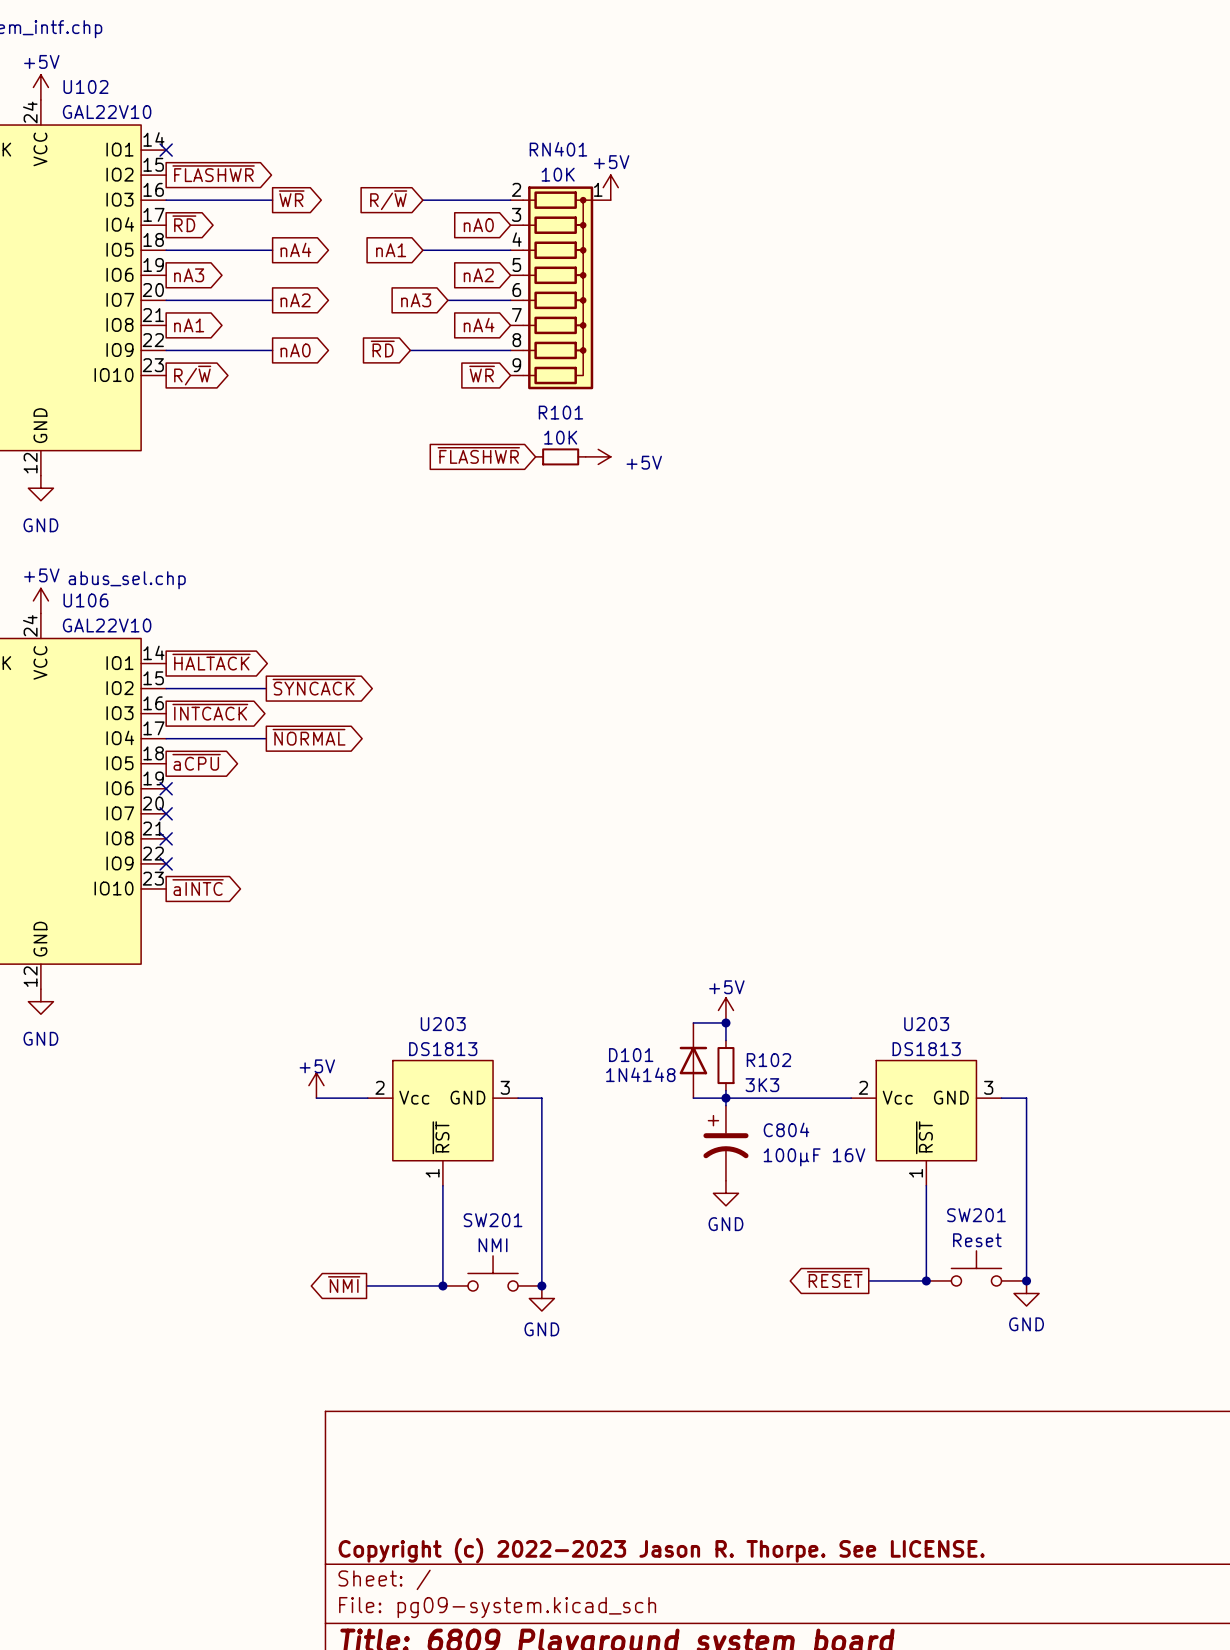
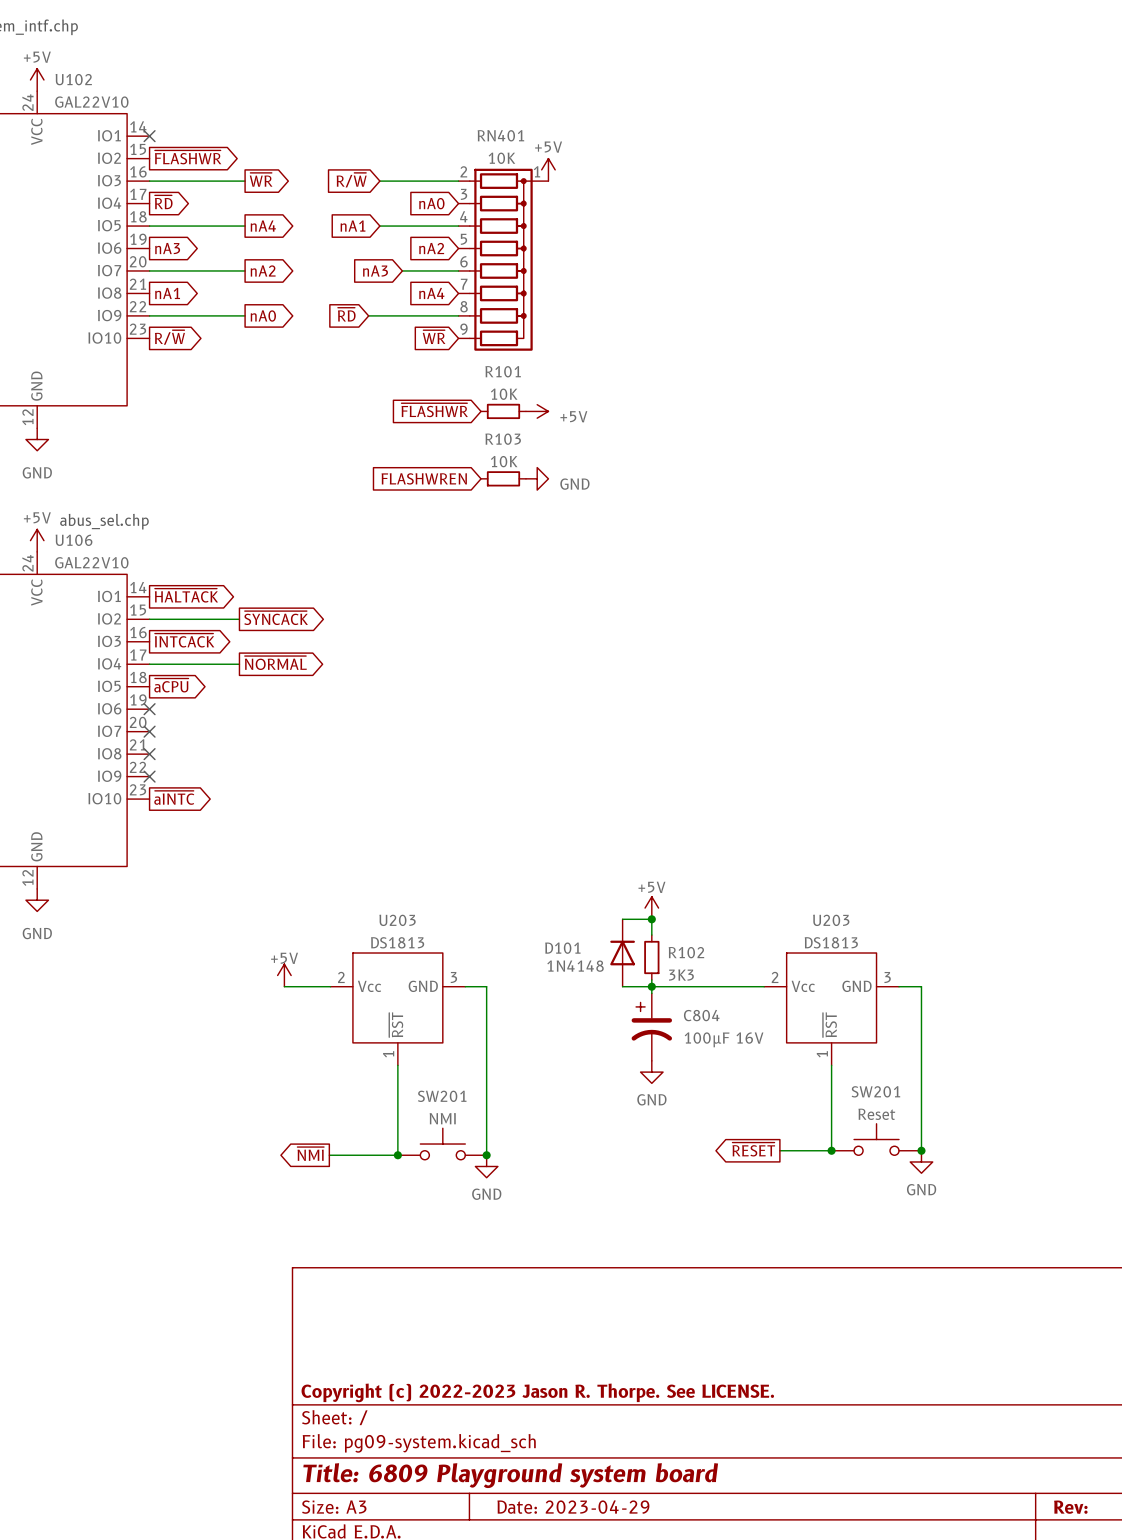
global label: none -> FLASHWREN (424, 478)
R103: none -> 10K (503, 478)
power symbol: none -> GND (537, 478)

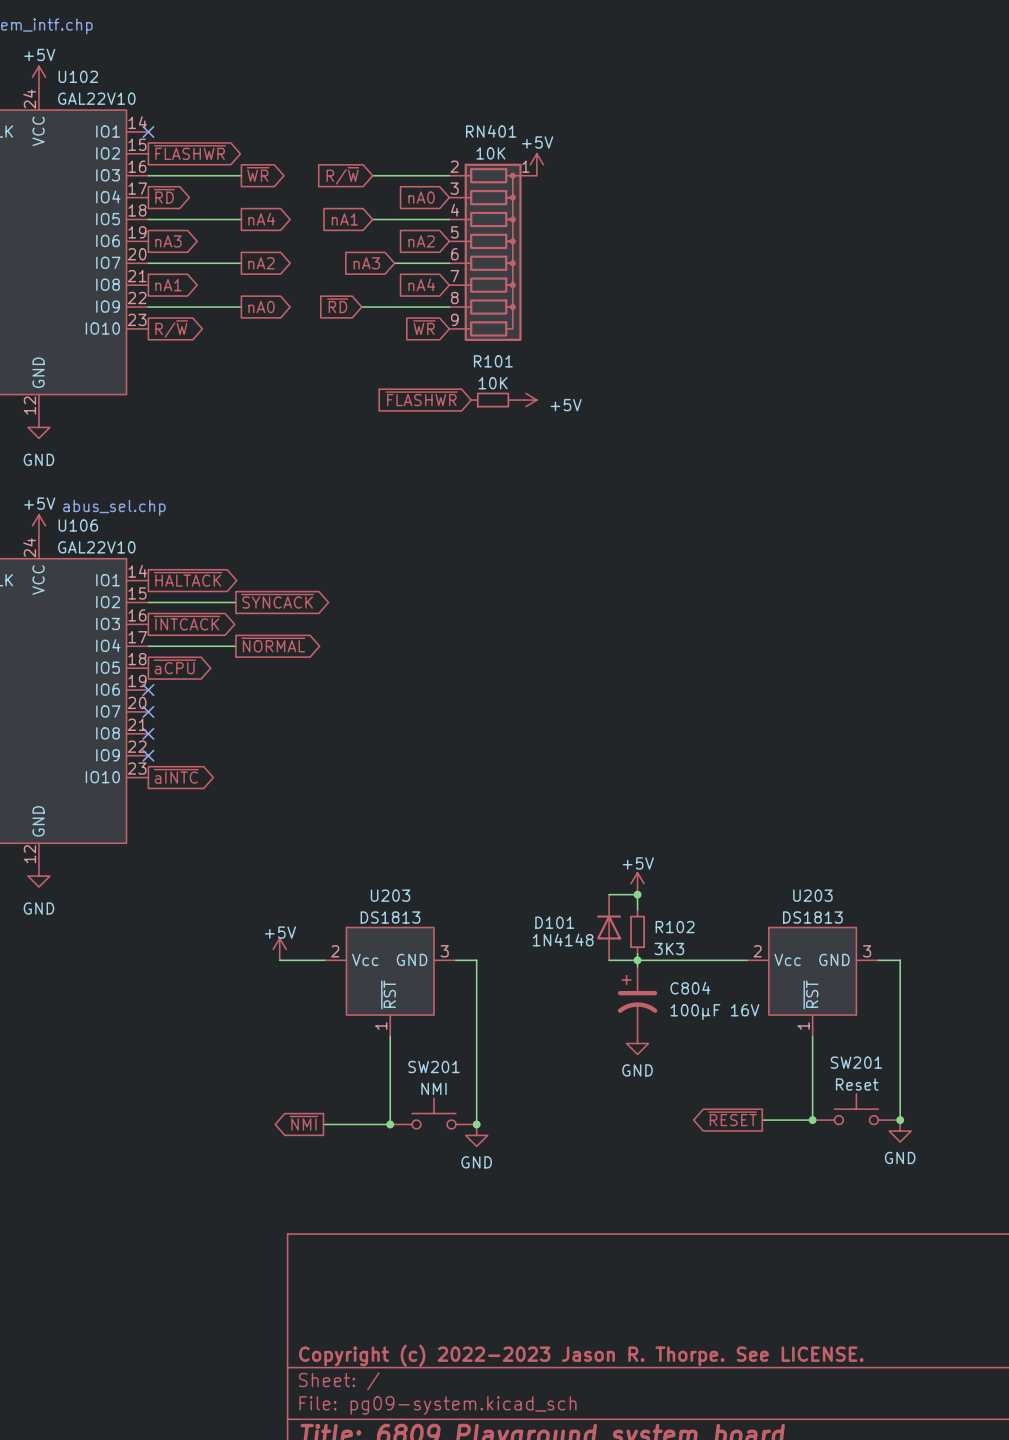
global label: FLASHWREN (424, 478) -> none
R103: 10K (503, 478) -> none
power symbol: GND (537, 478) -> none

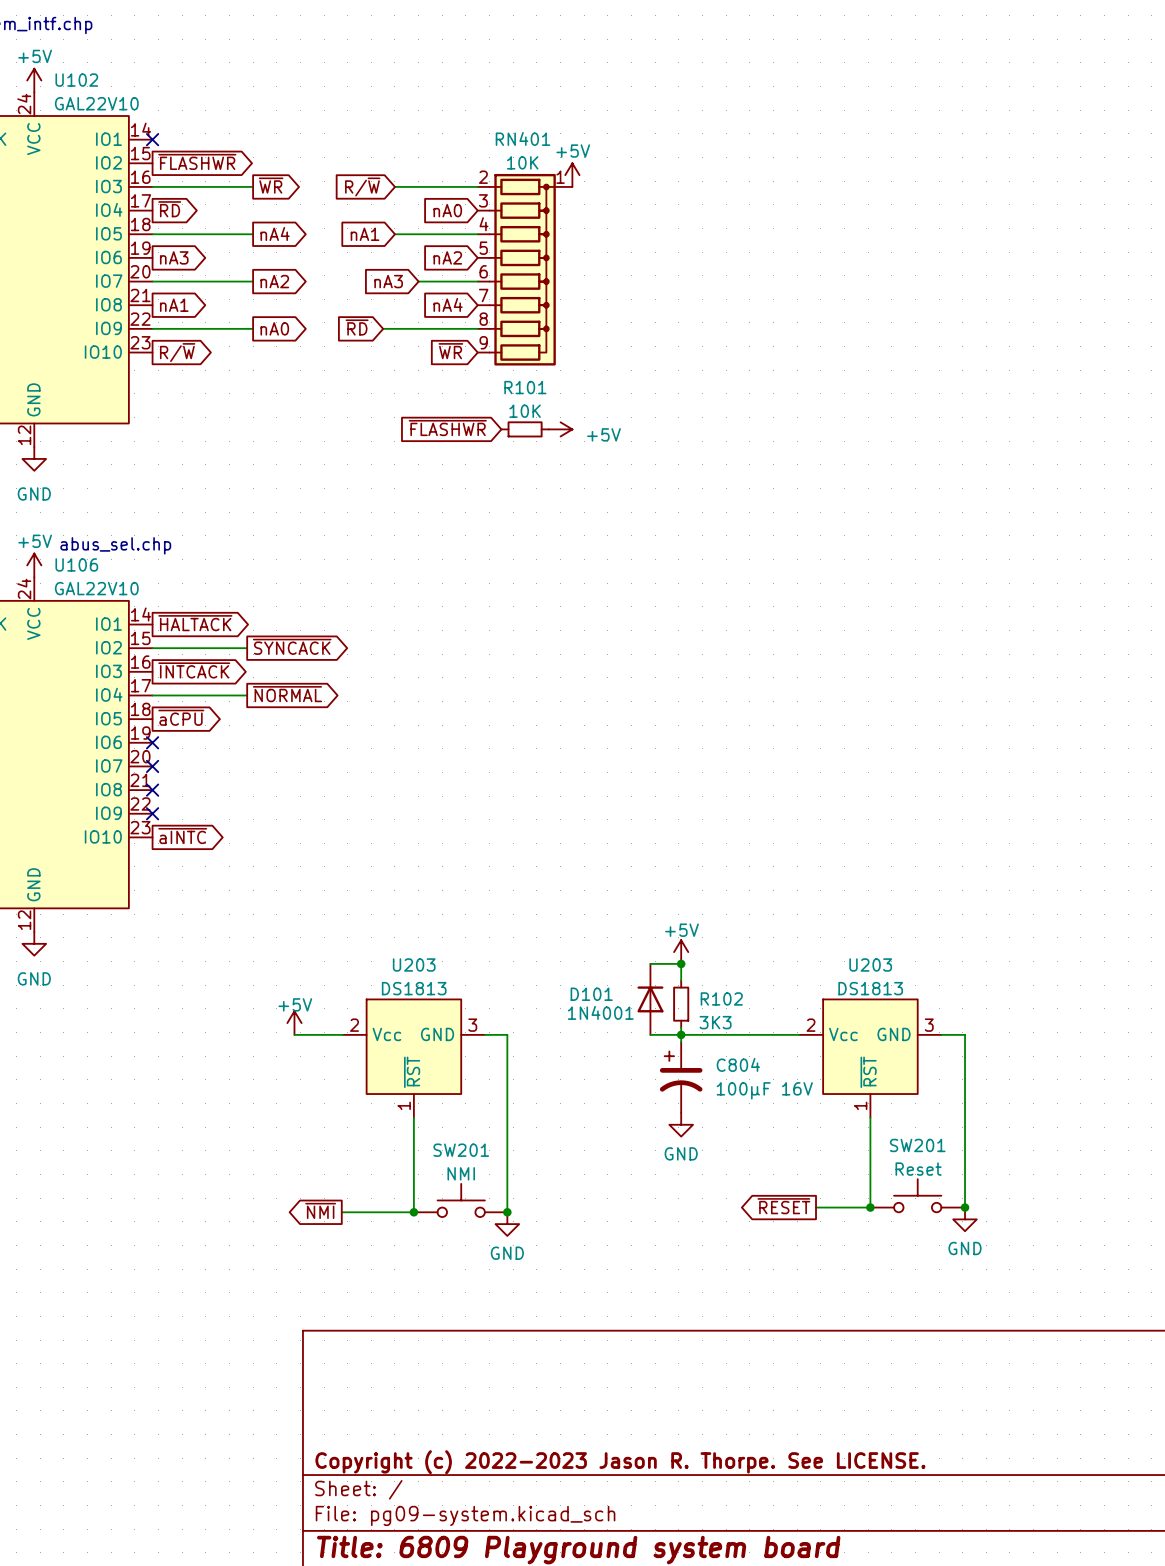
D101 value: 1N4148 (563, 939) -> 1N4001 (600, 1012)

